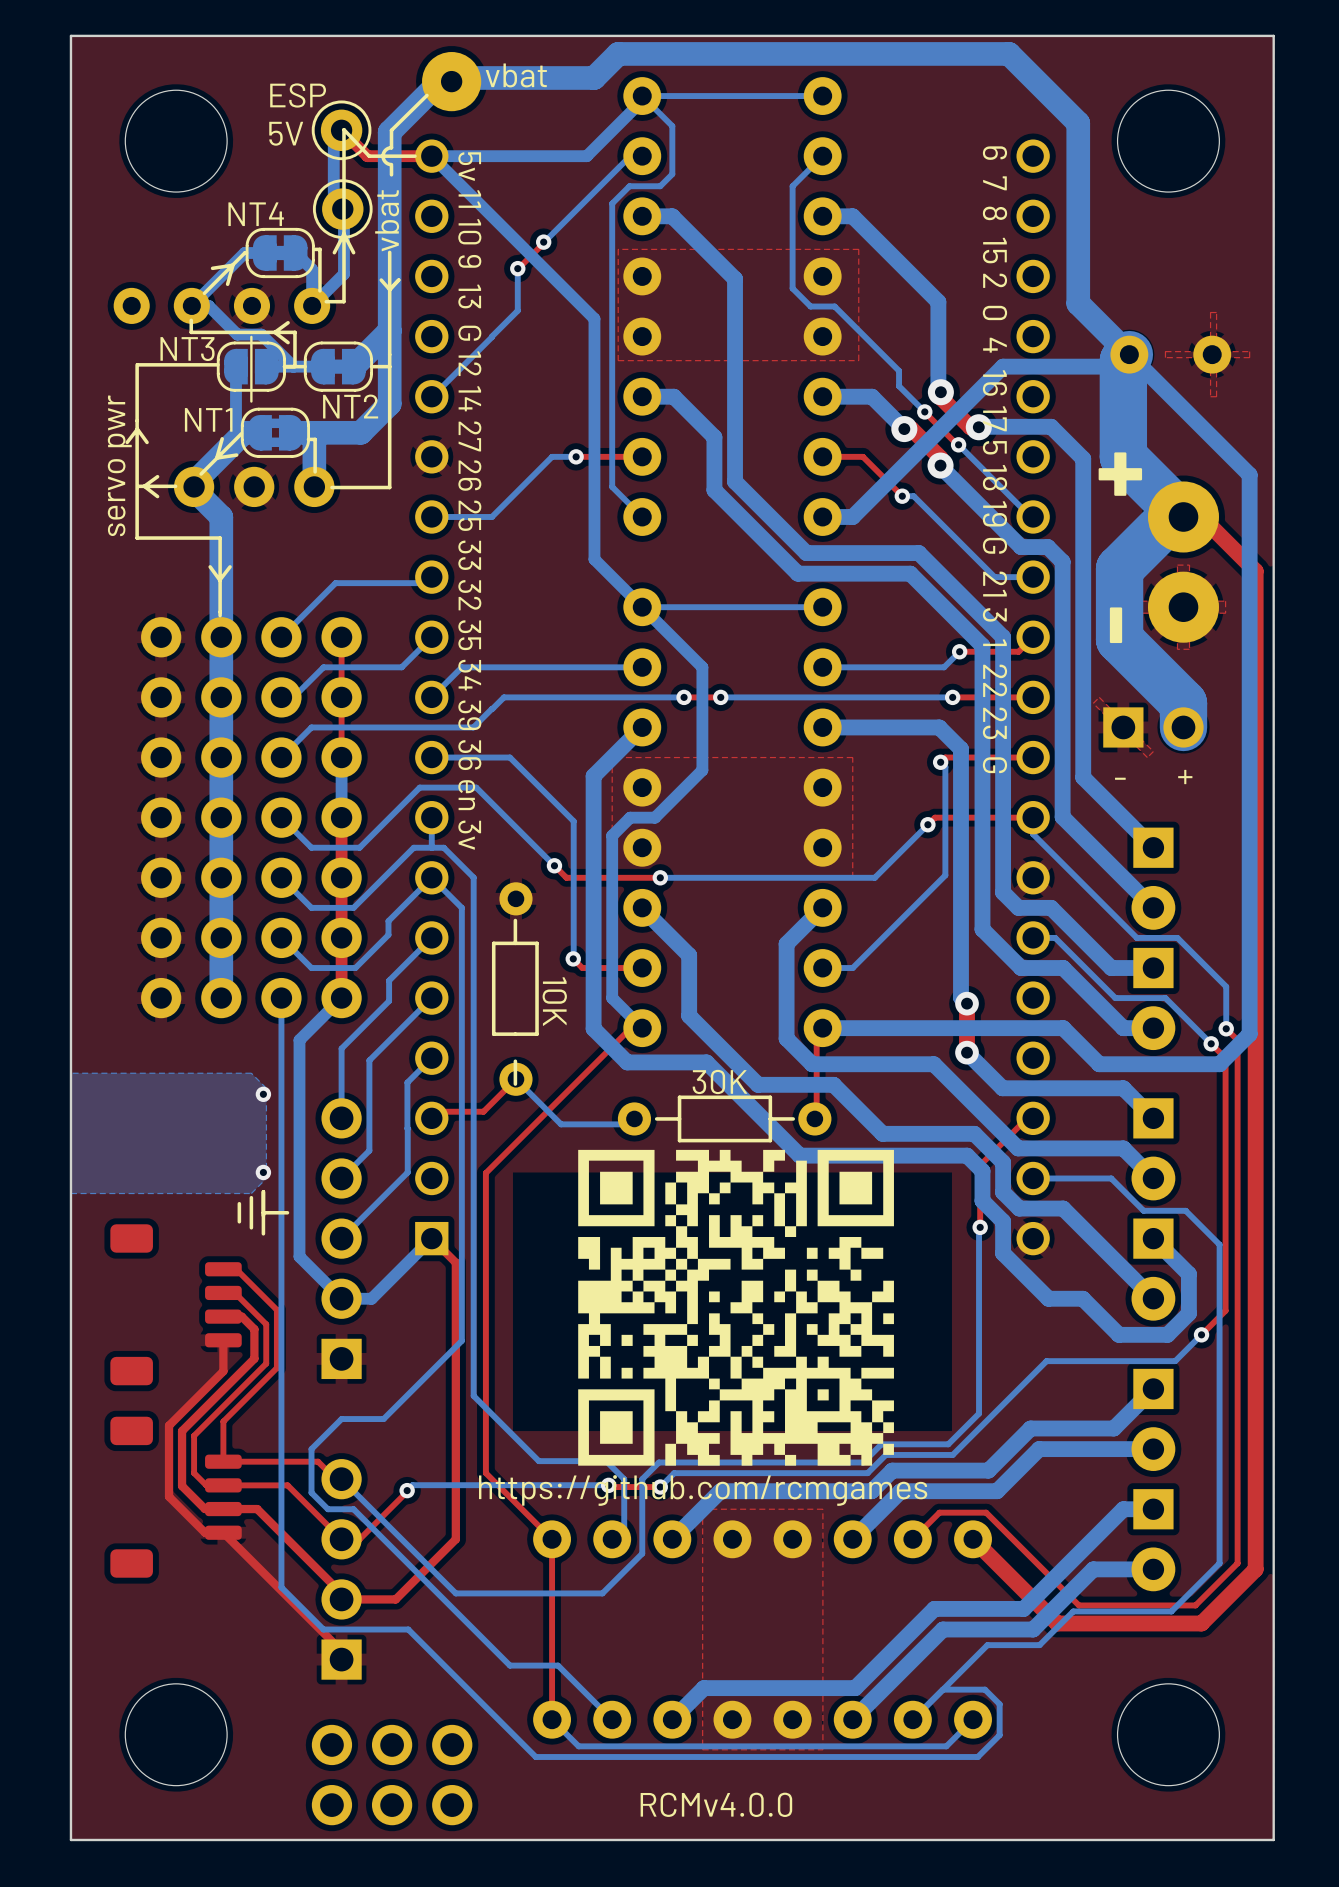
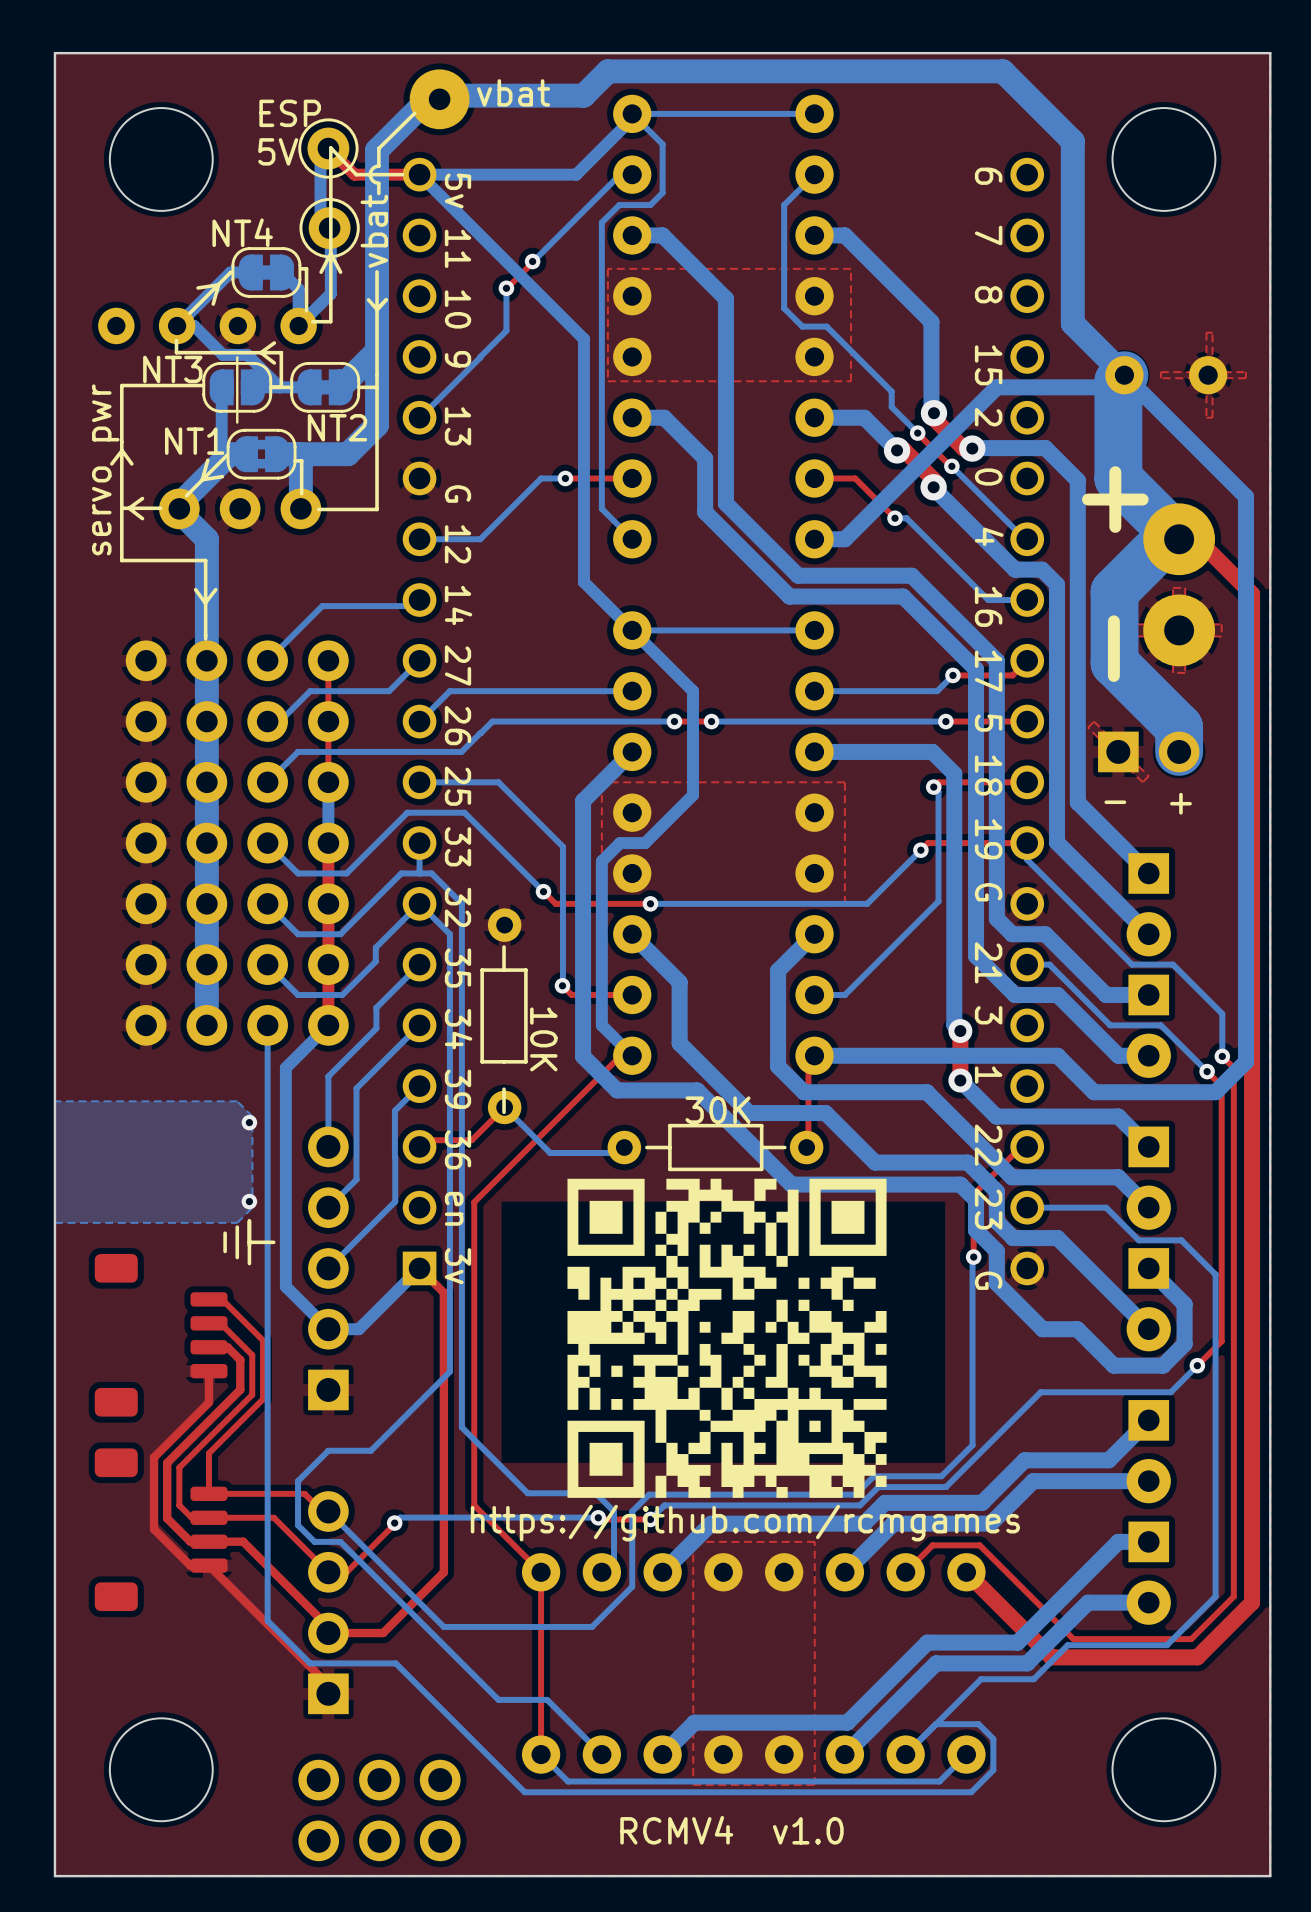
text: RCMv4.0.0 (716, 1804) -> RCMV4 v1.0 (732, 1830)

